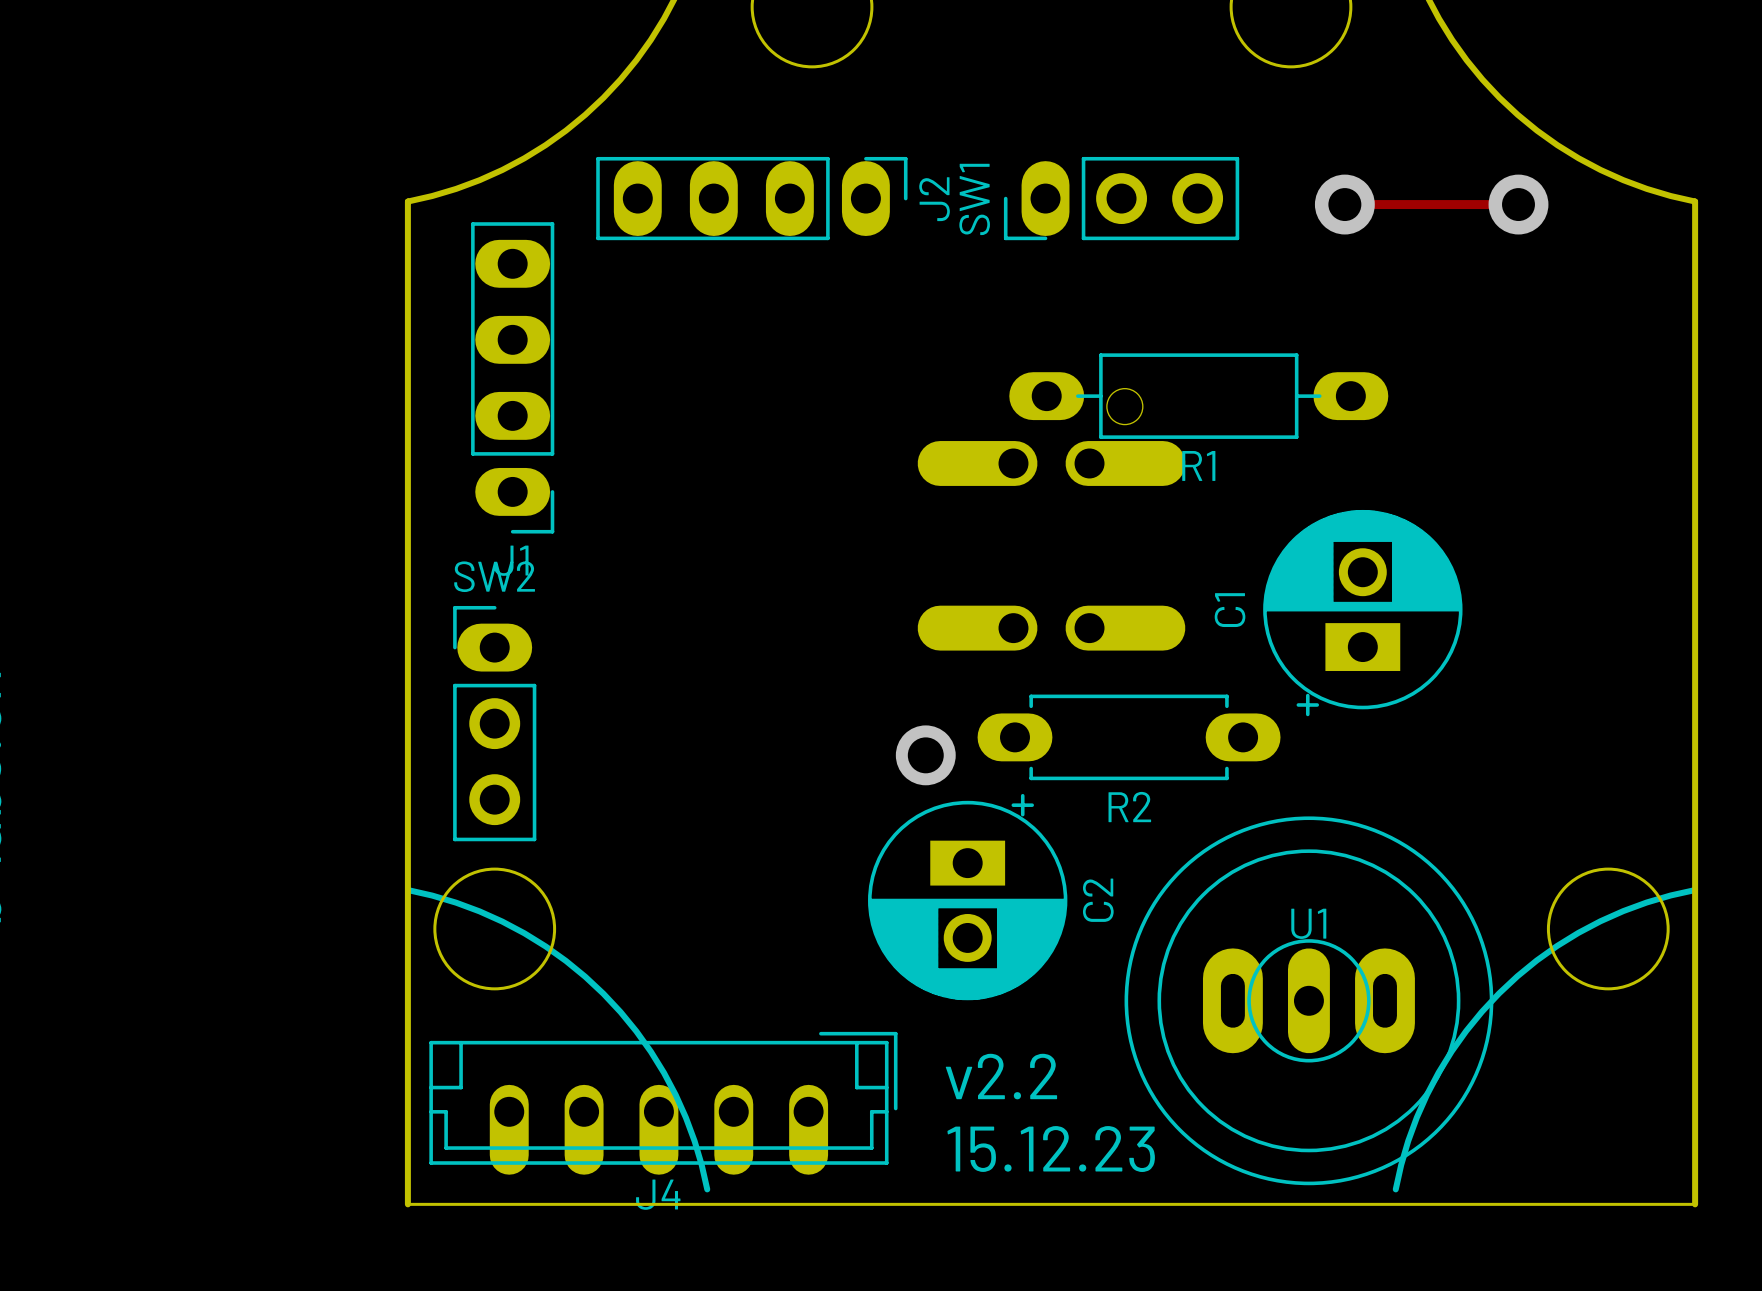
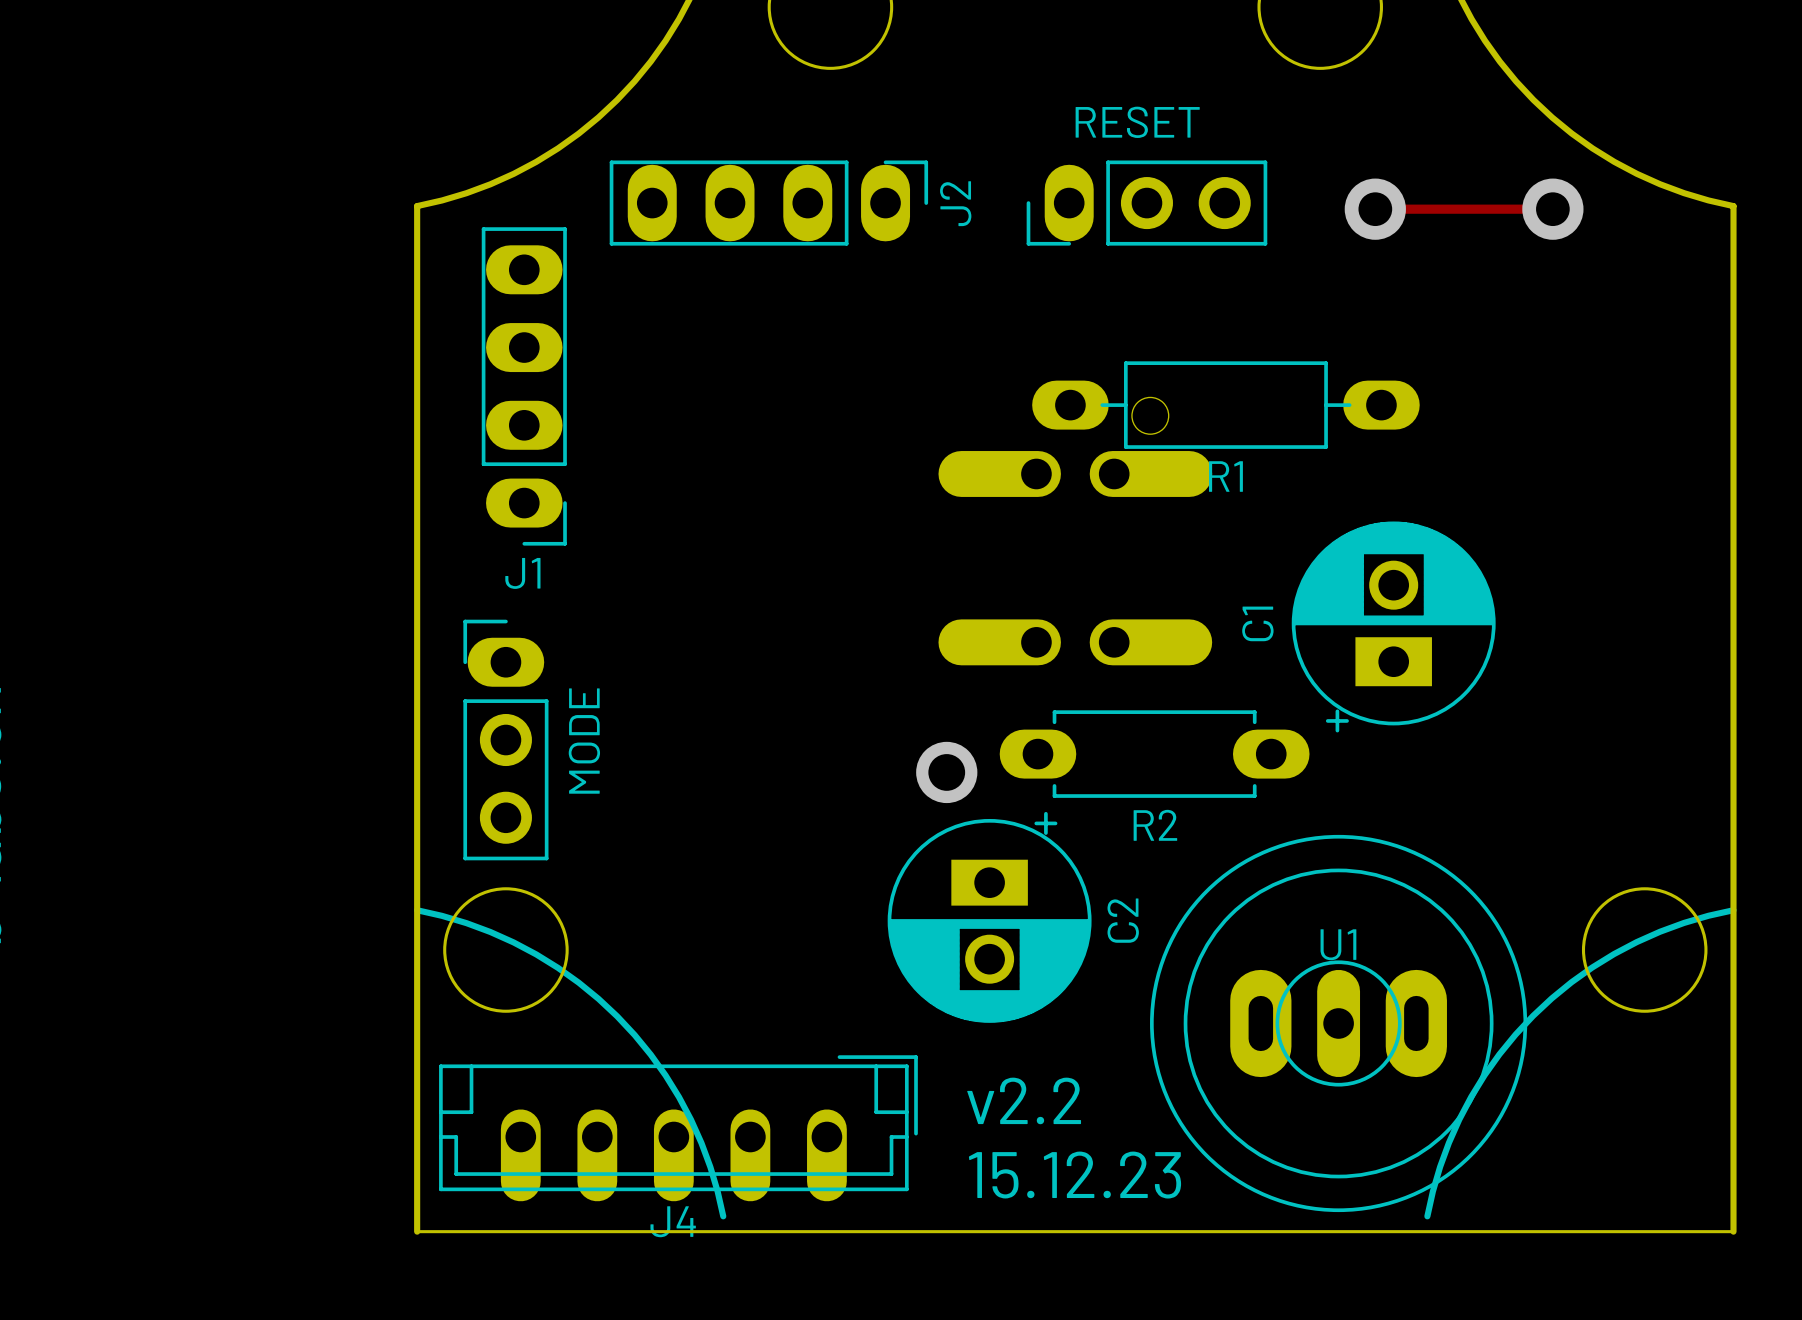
SW1 value: none -> RESET (1137, 122)
SW1 name: SW1 (974, 199) -> none
SW2 name: SW2 (494, 576) -> none
SW2 value: none -> MODE (584, 741)

